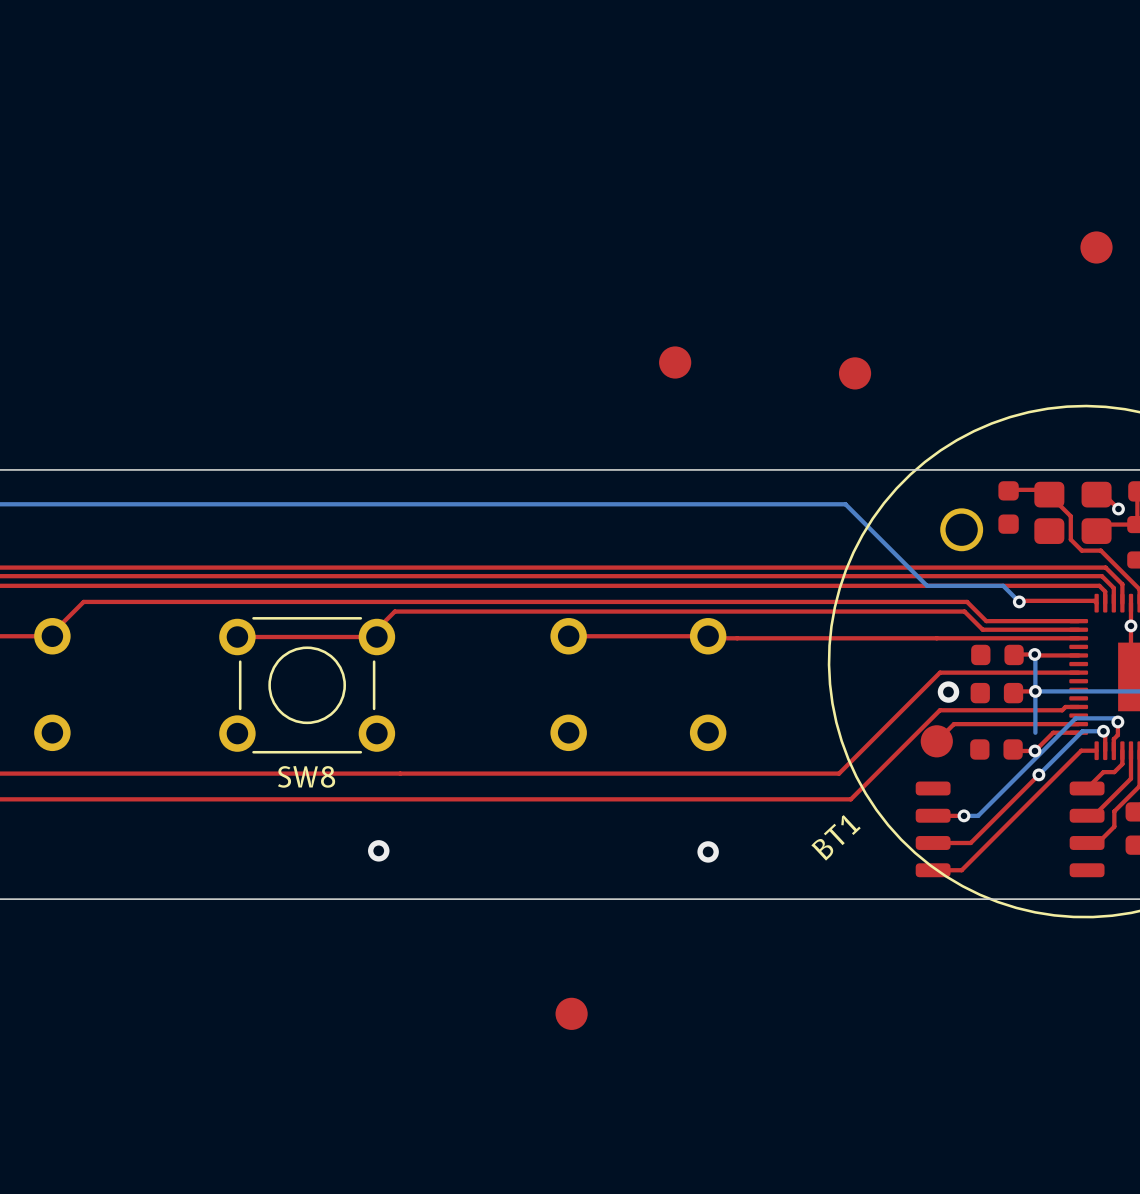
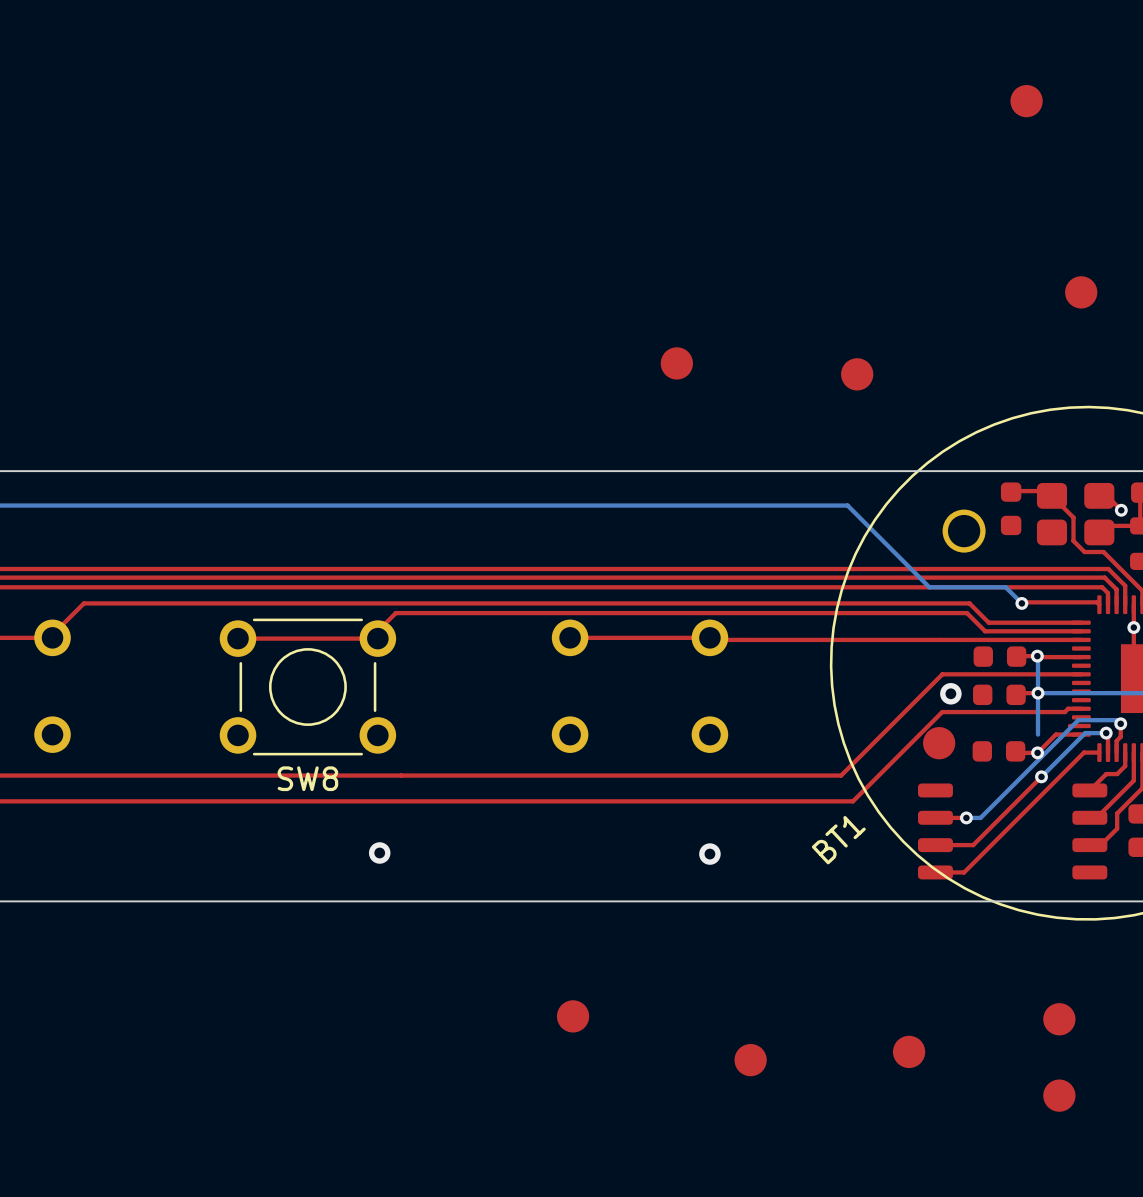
part: none -> (1026, 101)
part position: (1096, 247) -> (1081, 292)
top track: (1067, 724) (953, 724) (936, 741) -> none
part: none -> (1059, 1019)
part: none -> (909, 1051)
part: none -> (750, 1060)
part: none -> (1059, 1095)

